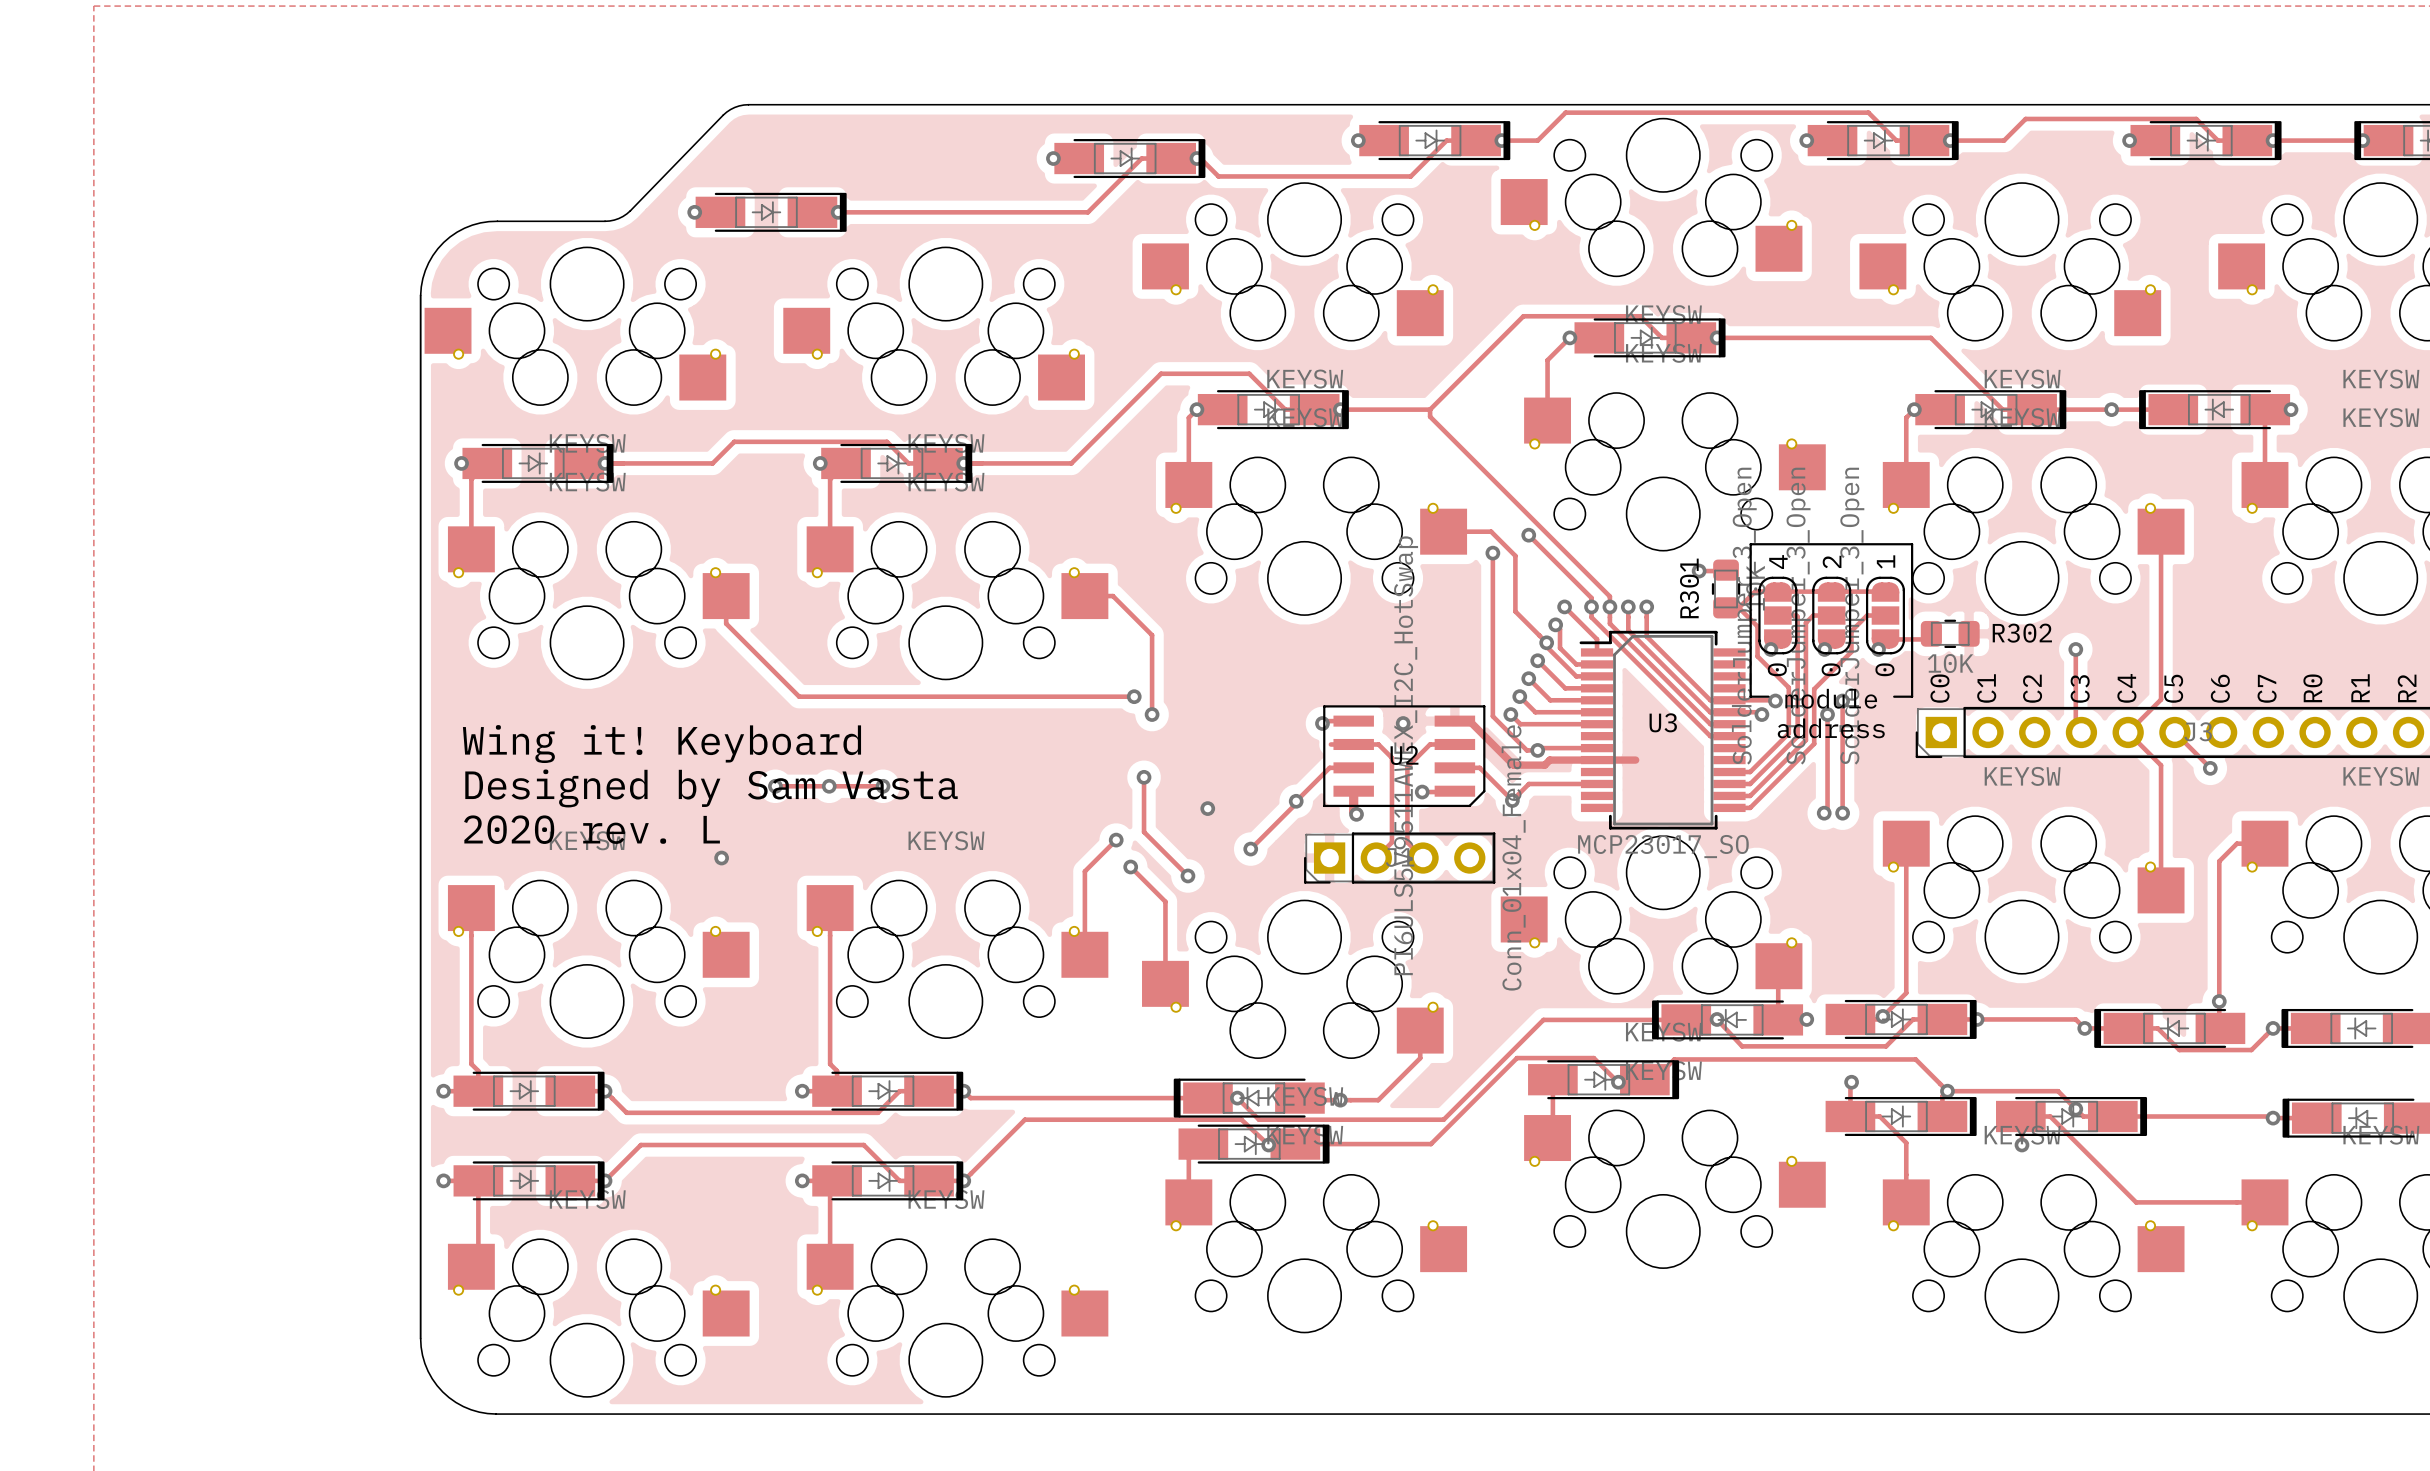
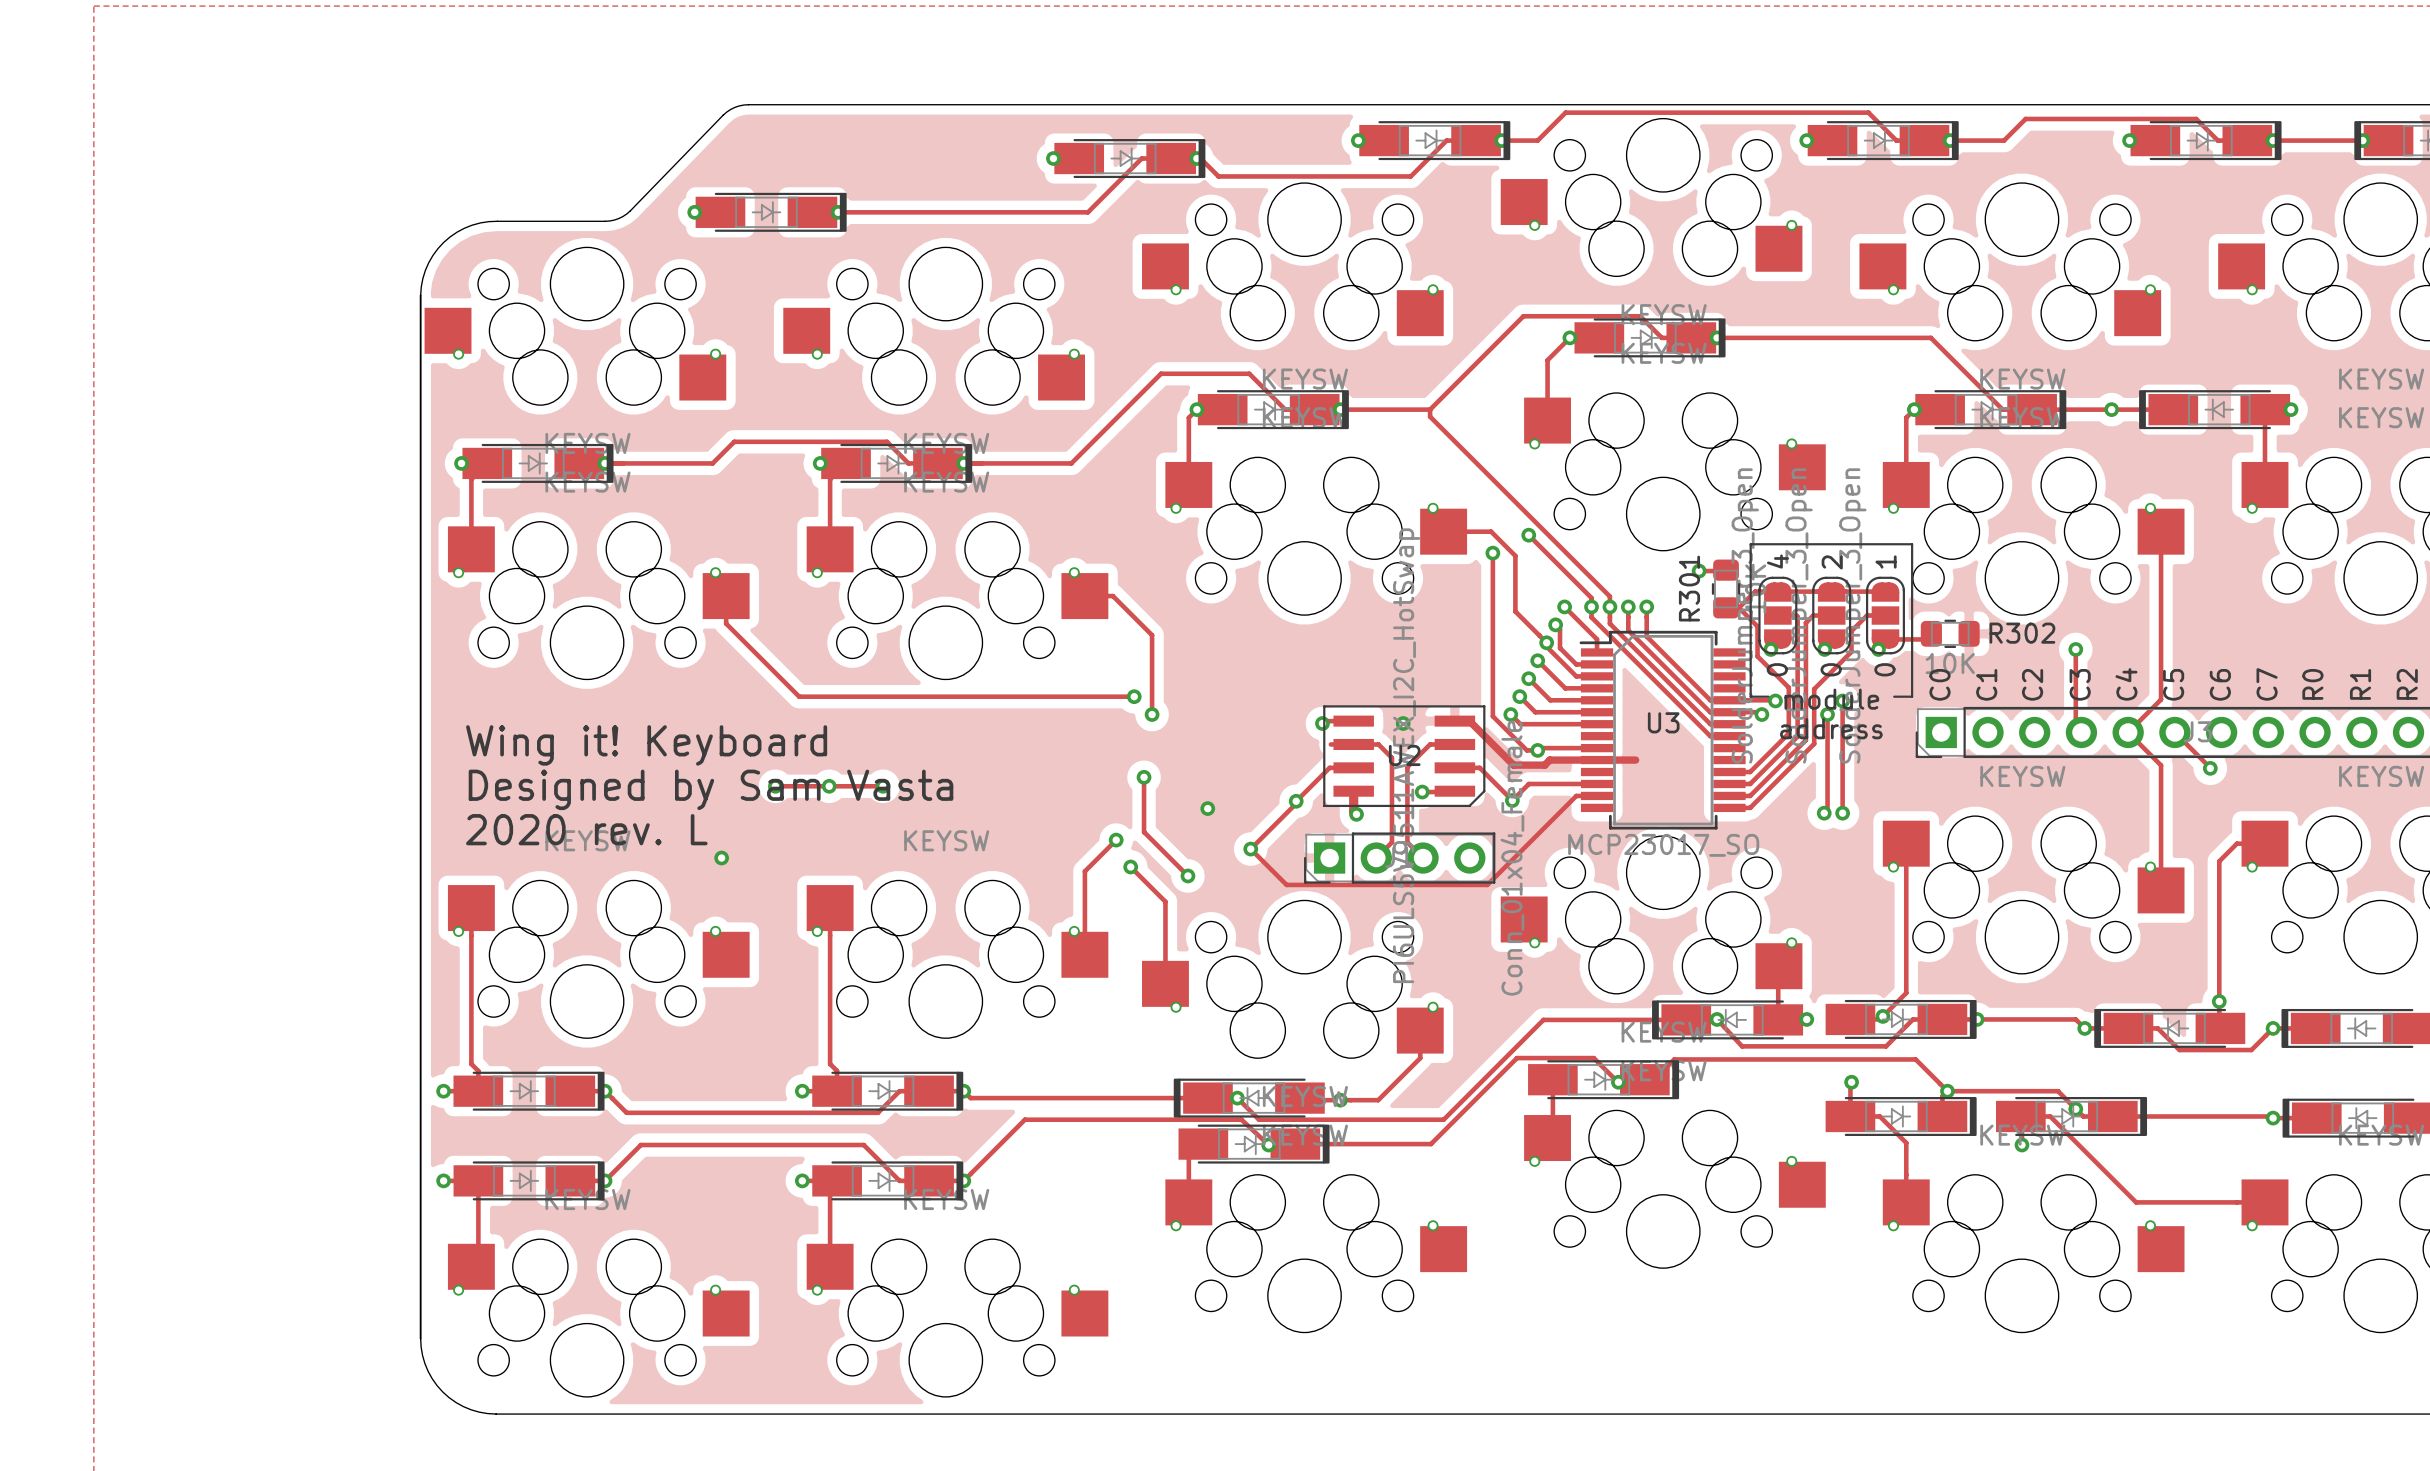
track: none -> (1597, 795) (1576, 795) (1487, 884) (1286, 884) (1250, 849)

